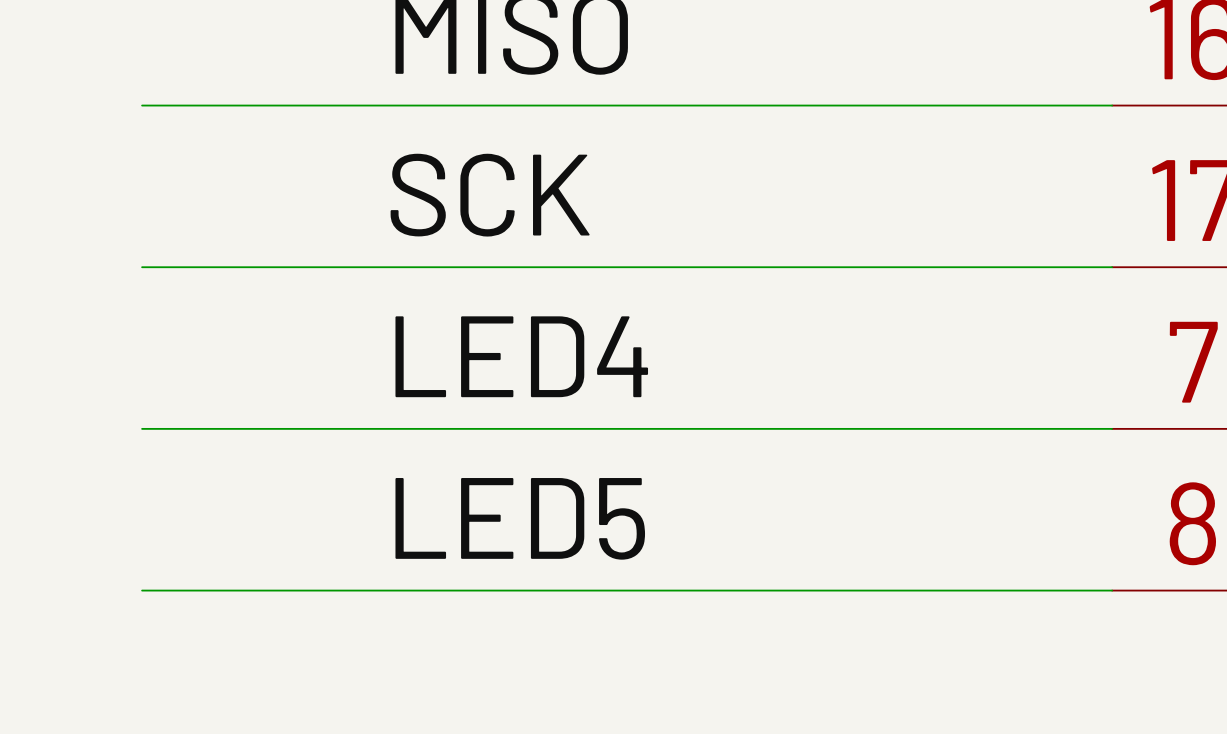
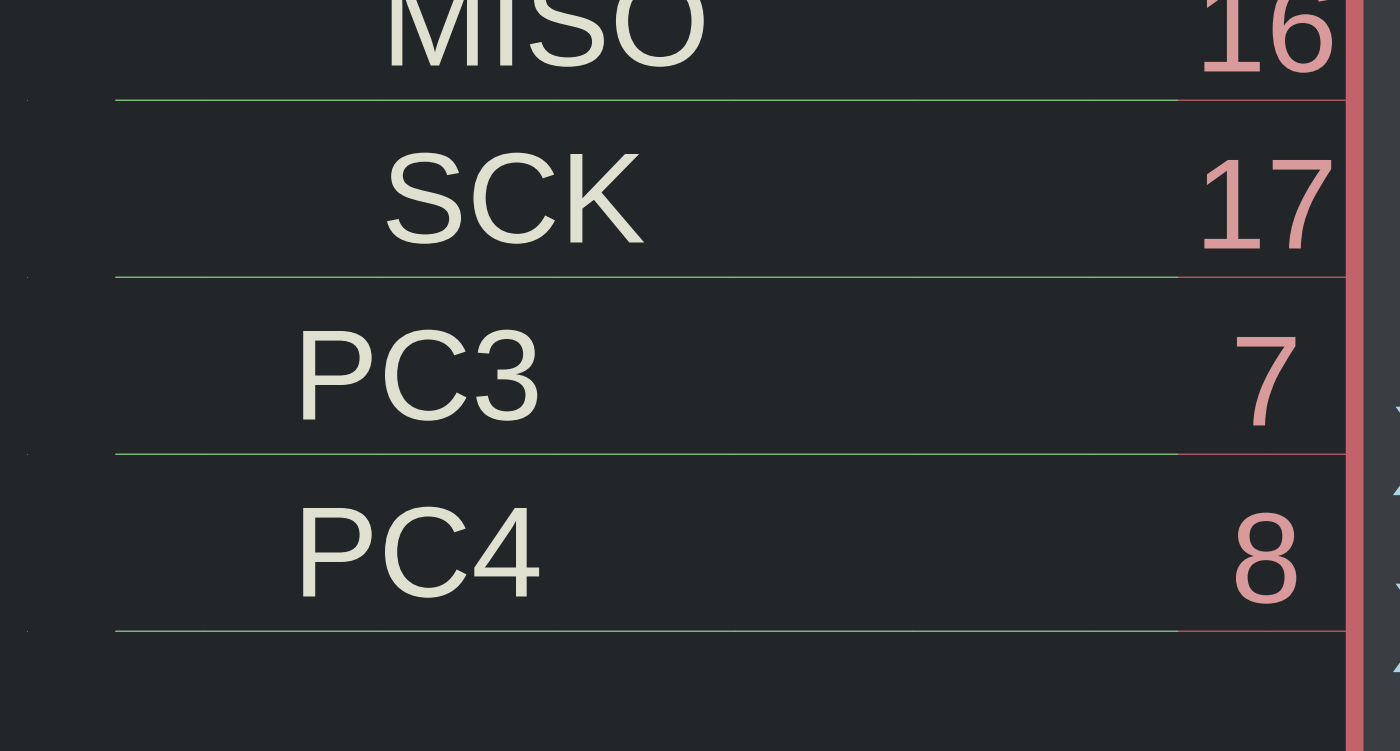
label: none -> PC3 (420, 375)
label: LED4 (521, 356) -> none
label: none -> PC4 (421, 552)
label: LED5 (520, 518) -> none

